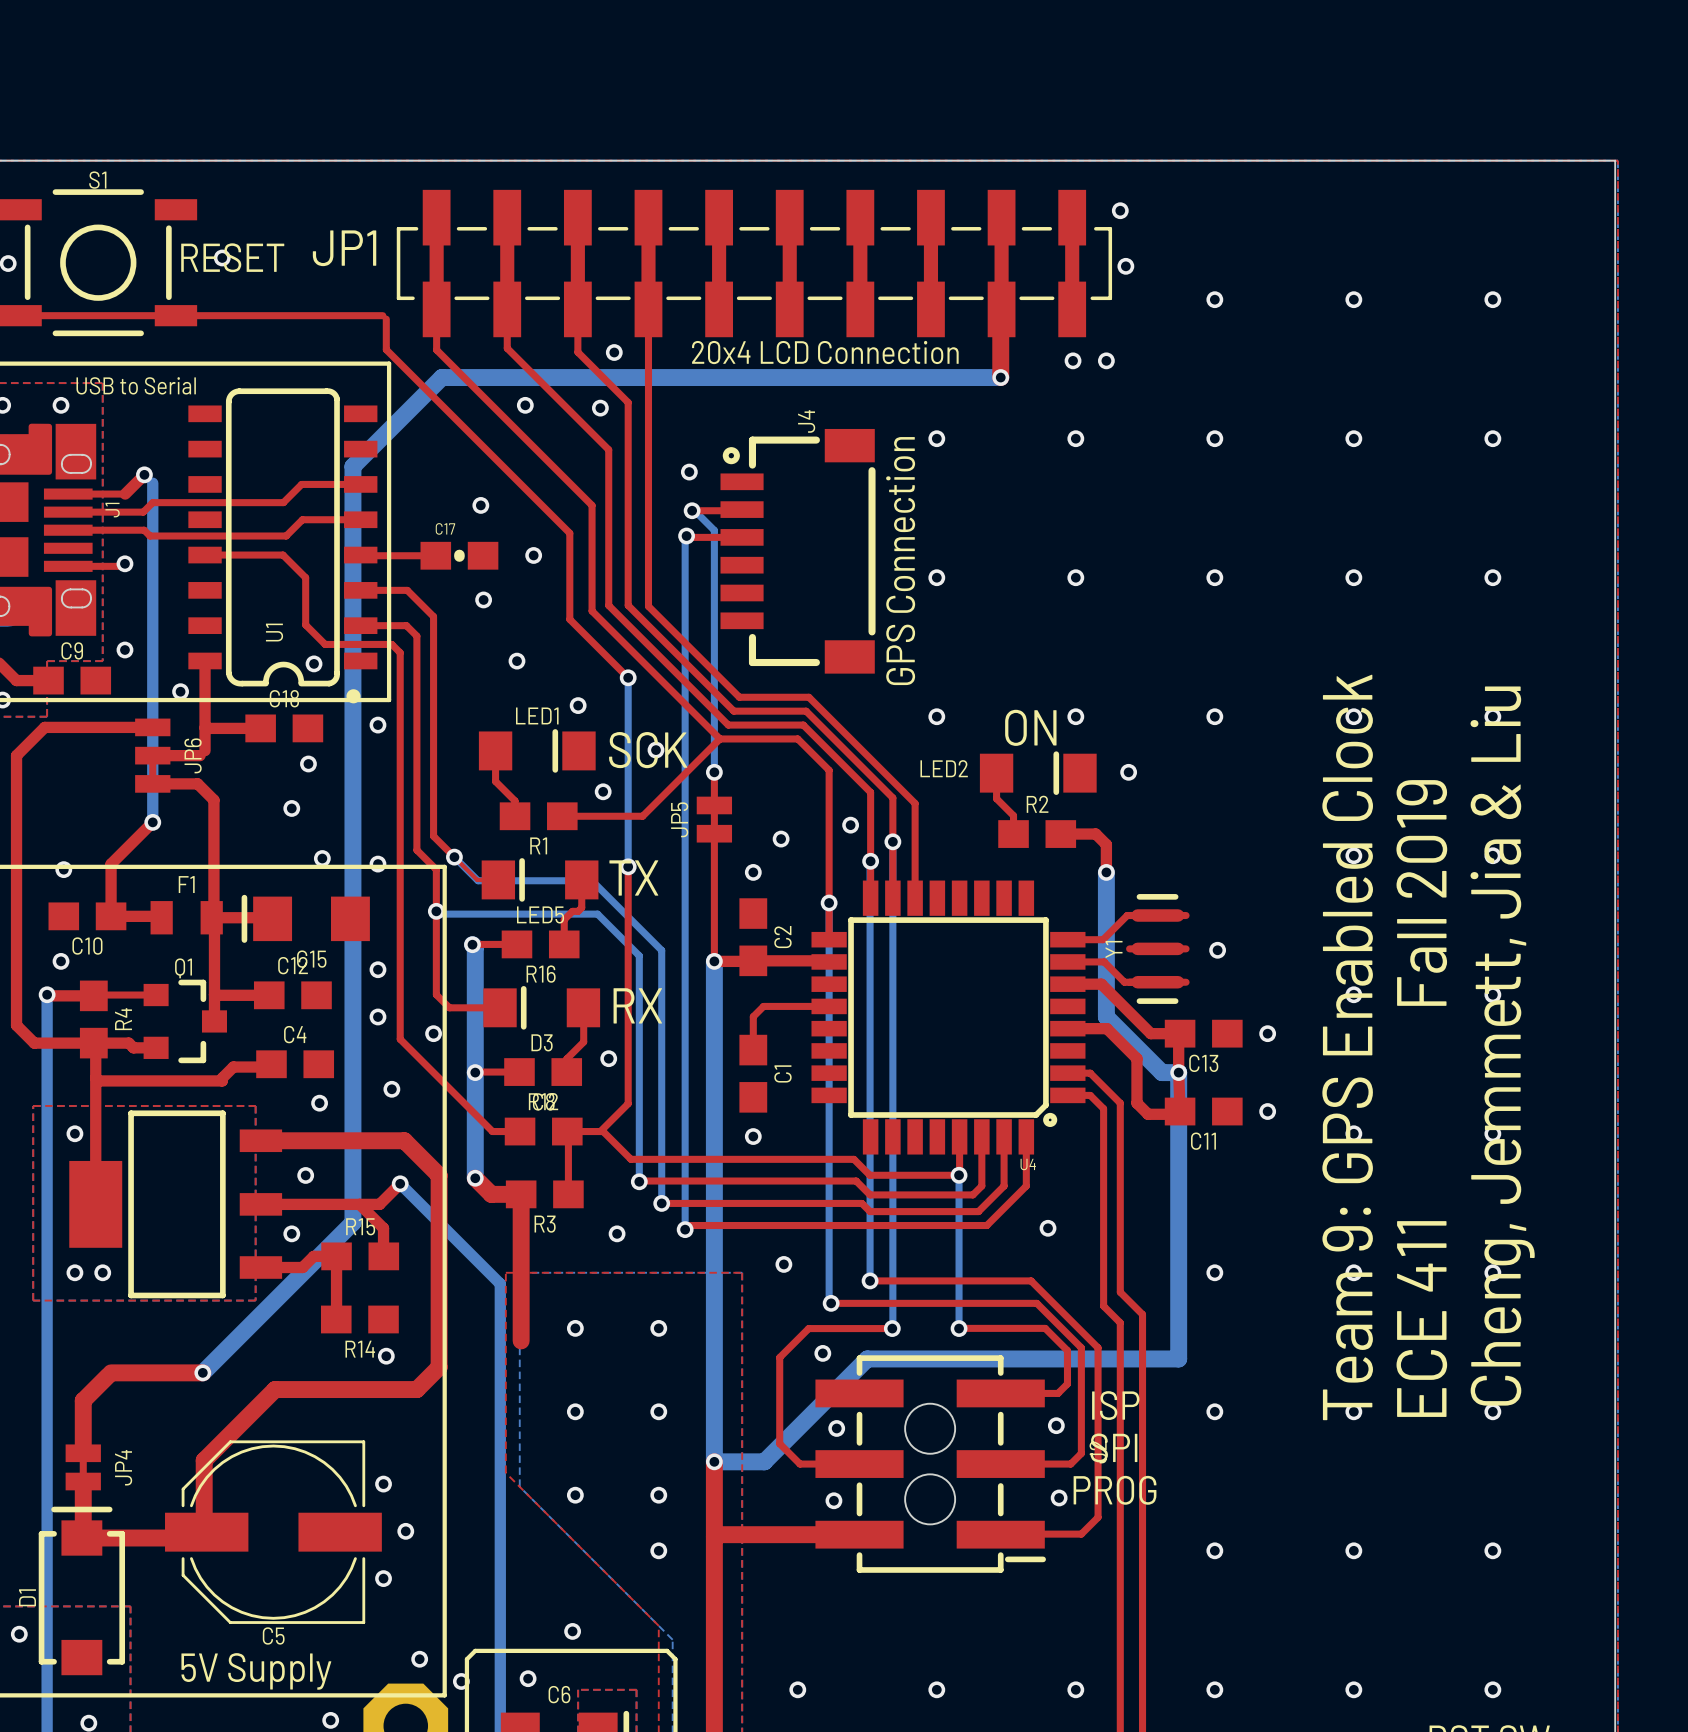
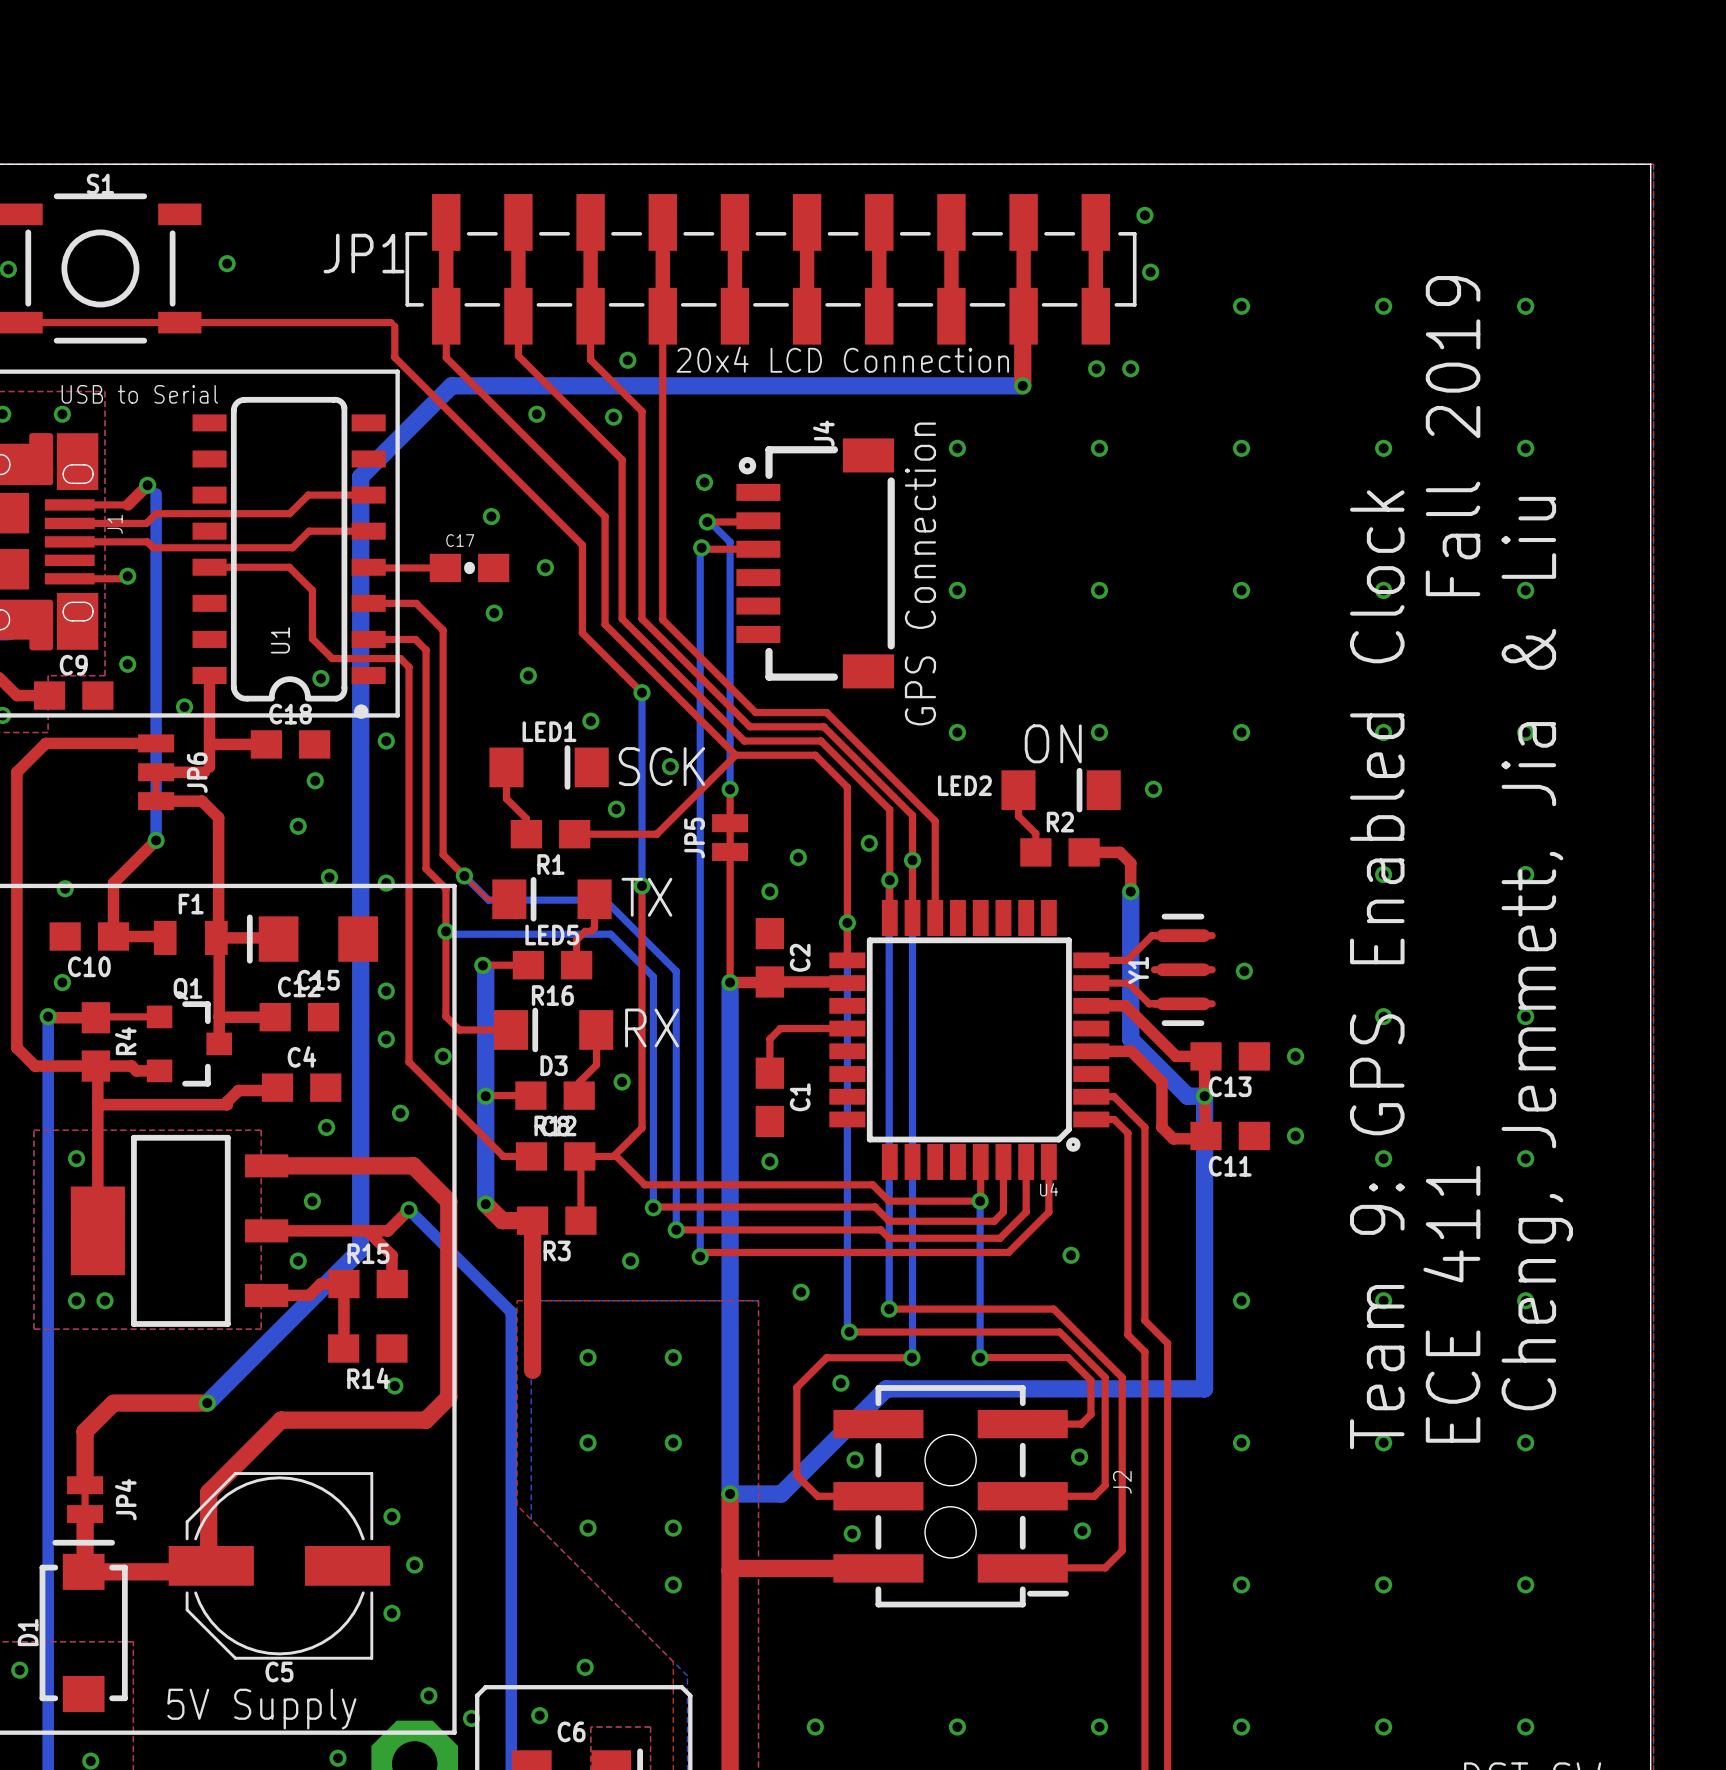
text: RESET (232, 257) -> none
text: ISP (1115, 1405) -> none
text: SPI (1113, 1447) -> none
text: PROG (1115, 1490) -> none

